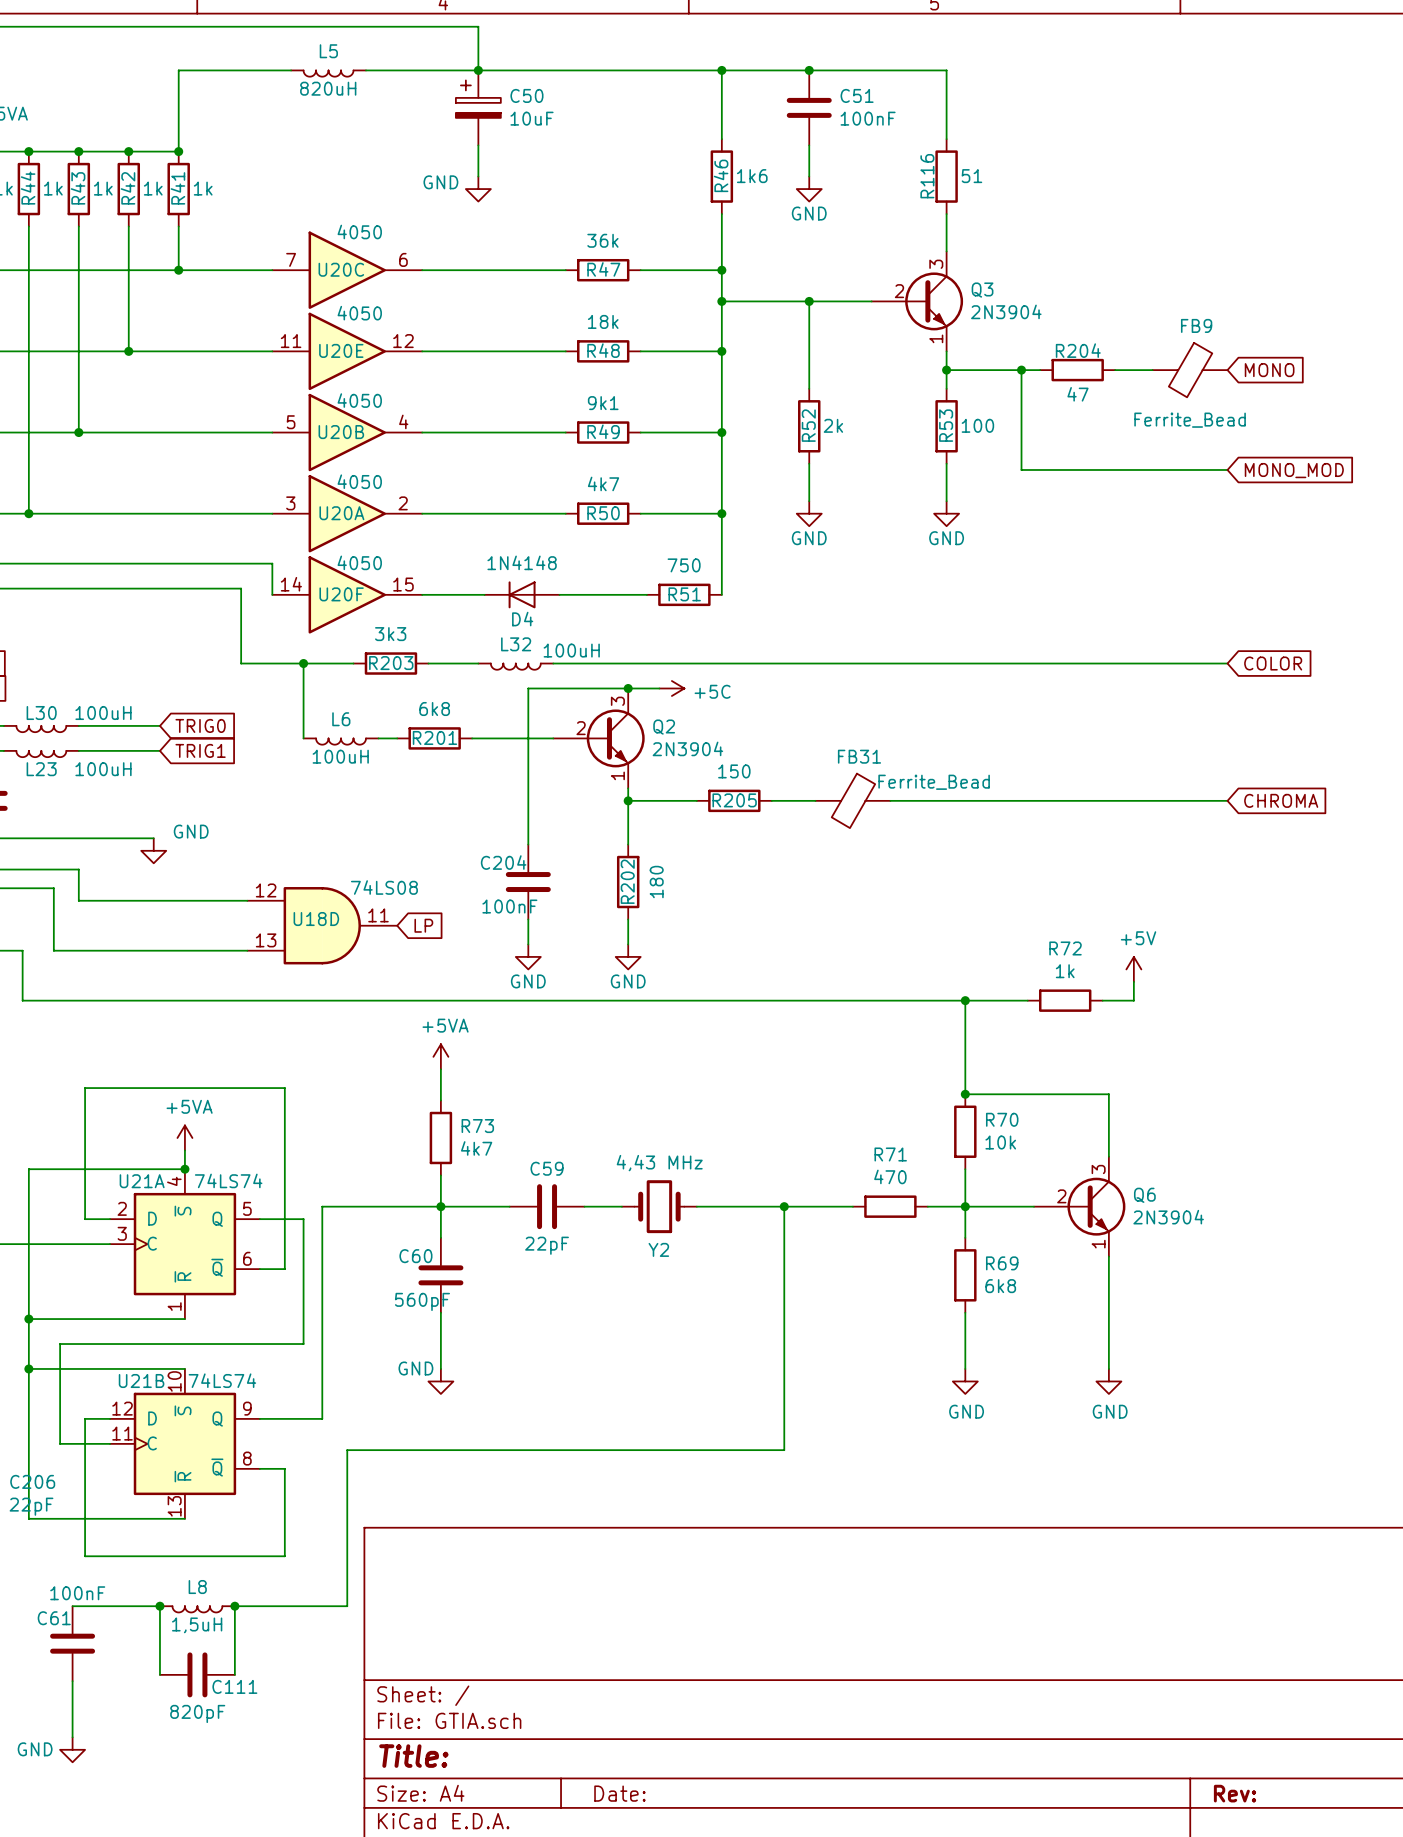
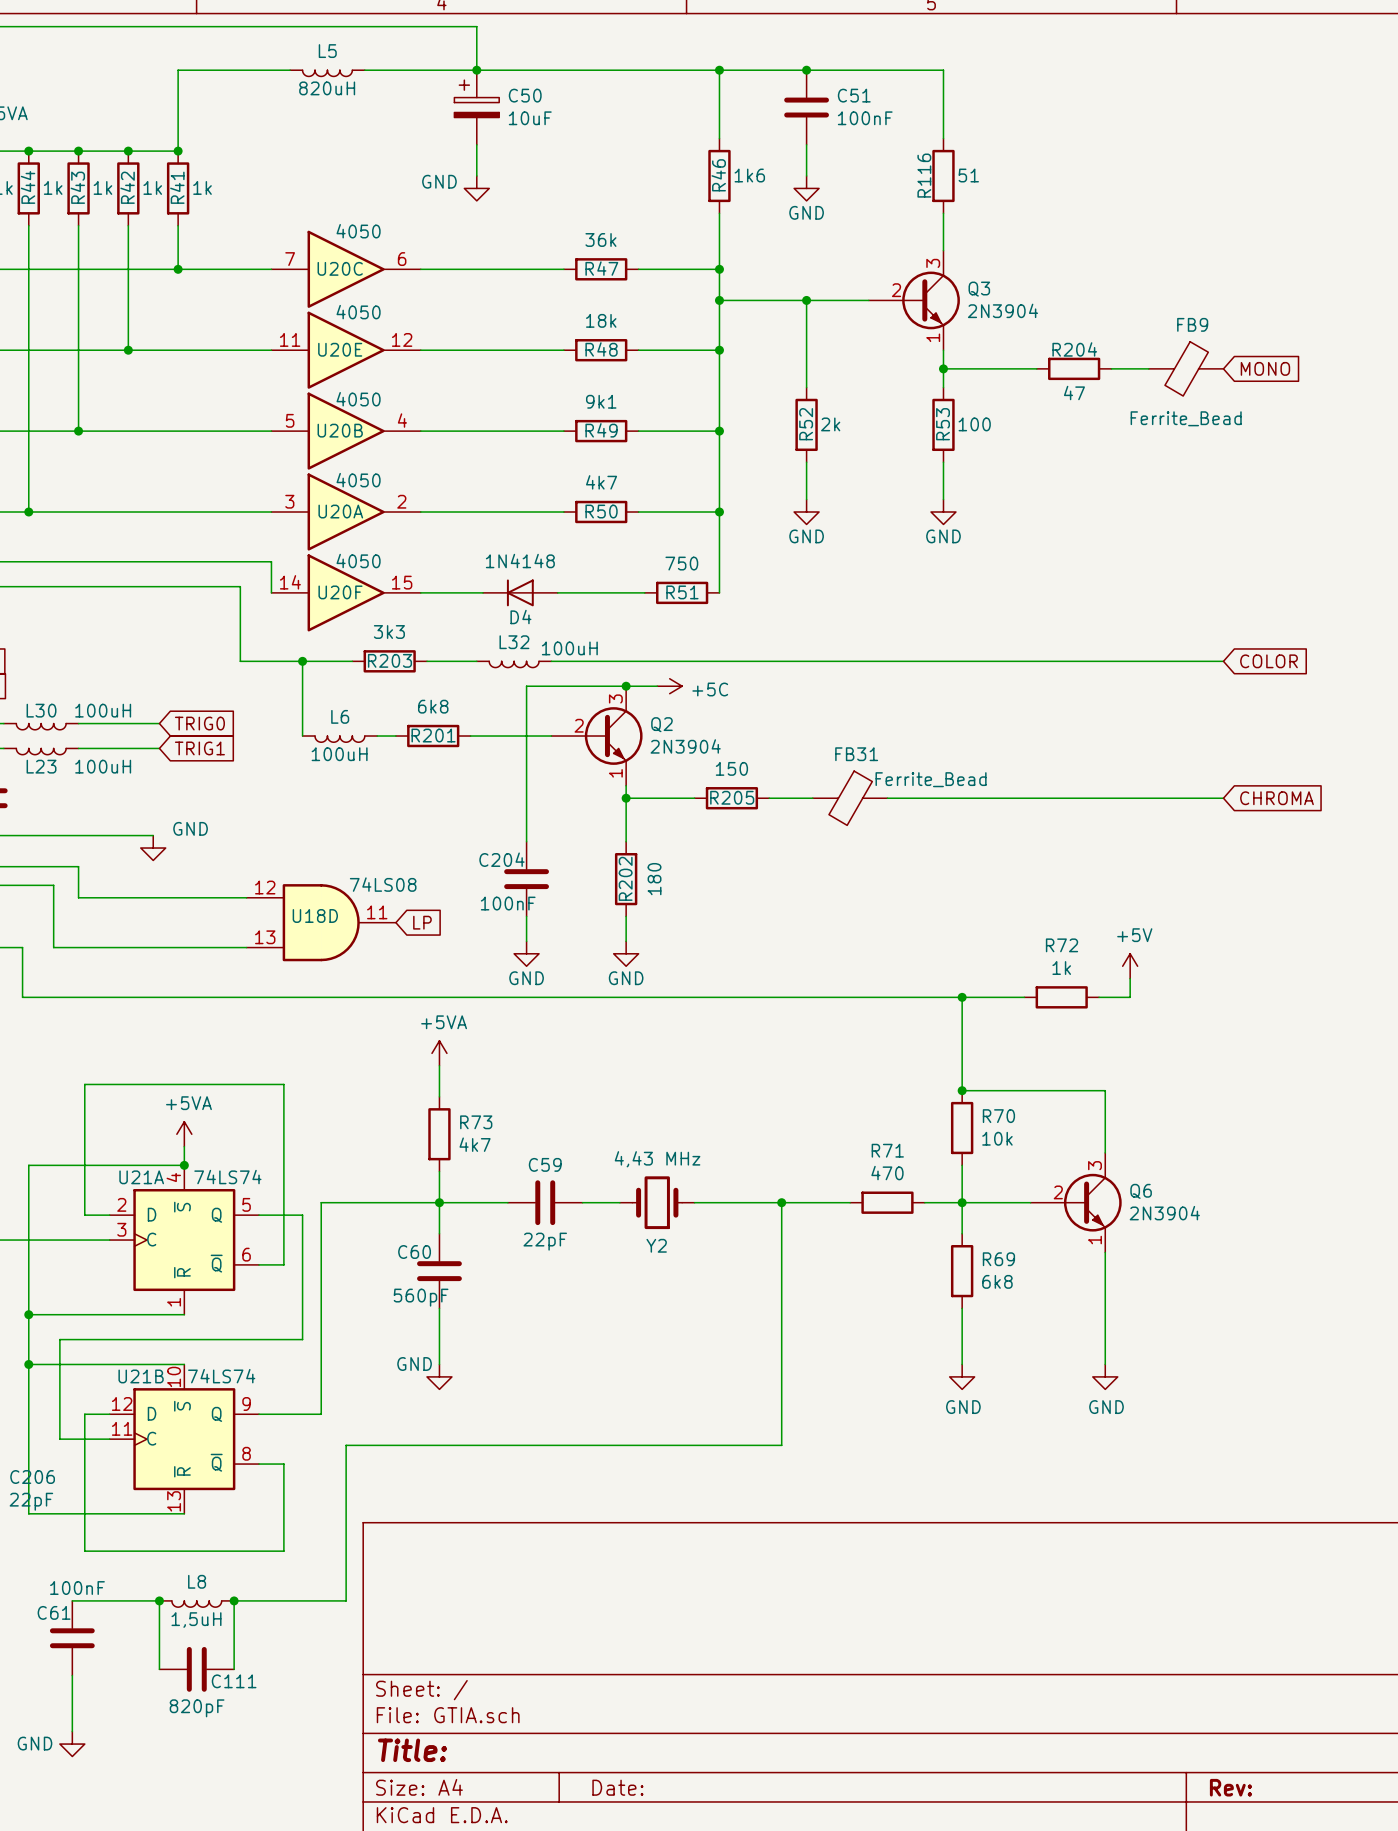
wire: (1021, 370) (1021, 469) (1227, 469) -> none
junction: (1021, 370) -> none
global label: MONO_MOD (1294, 470) -> none

